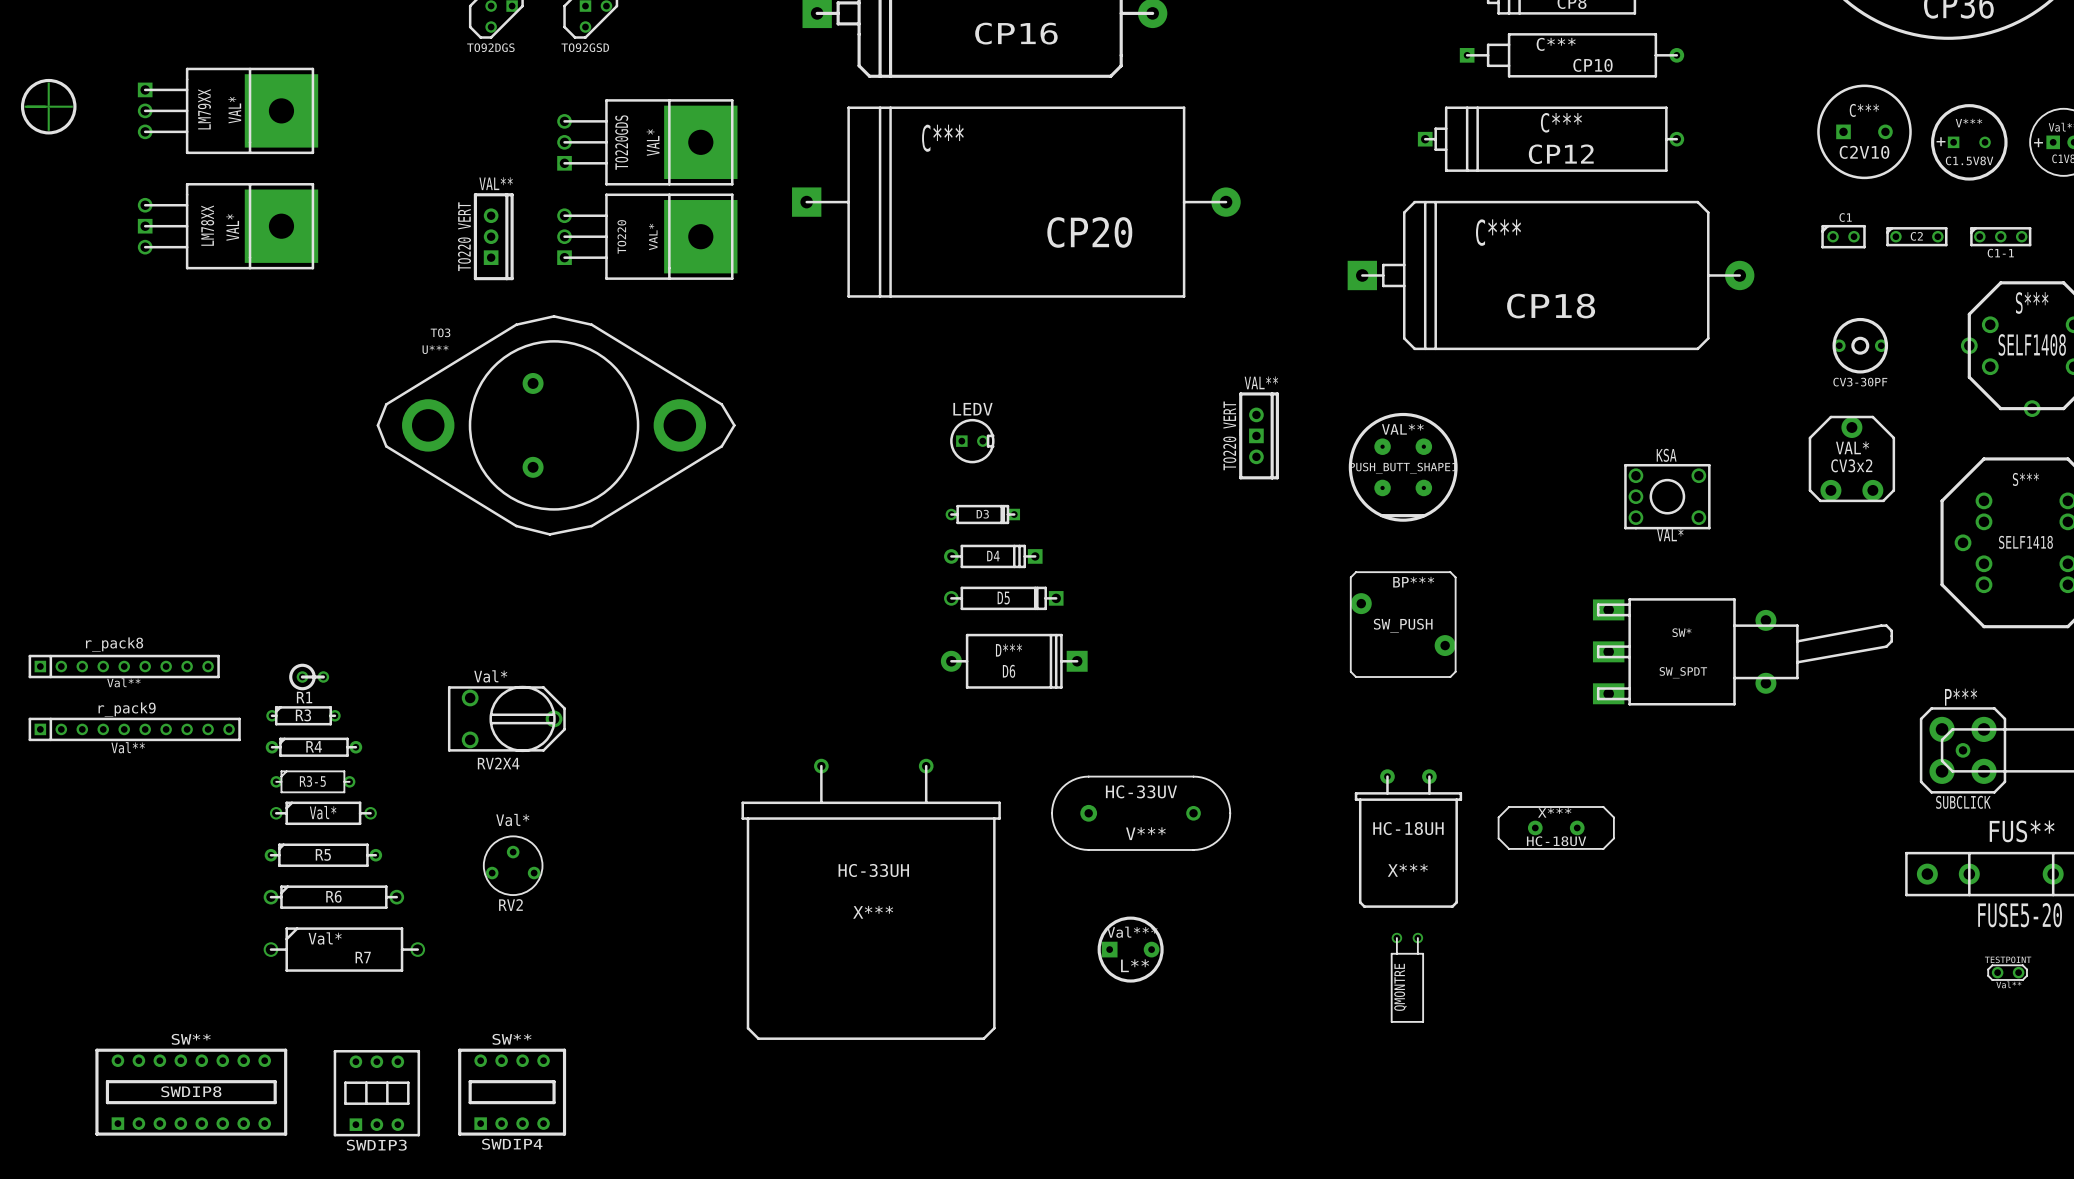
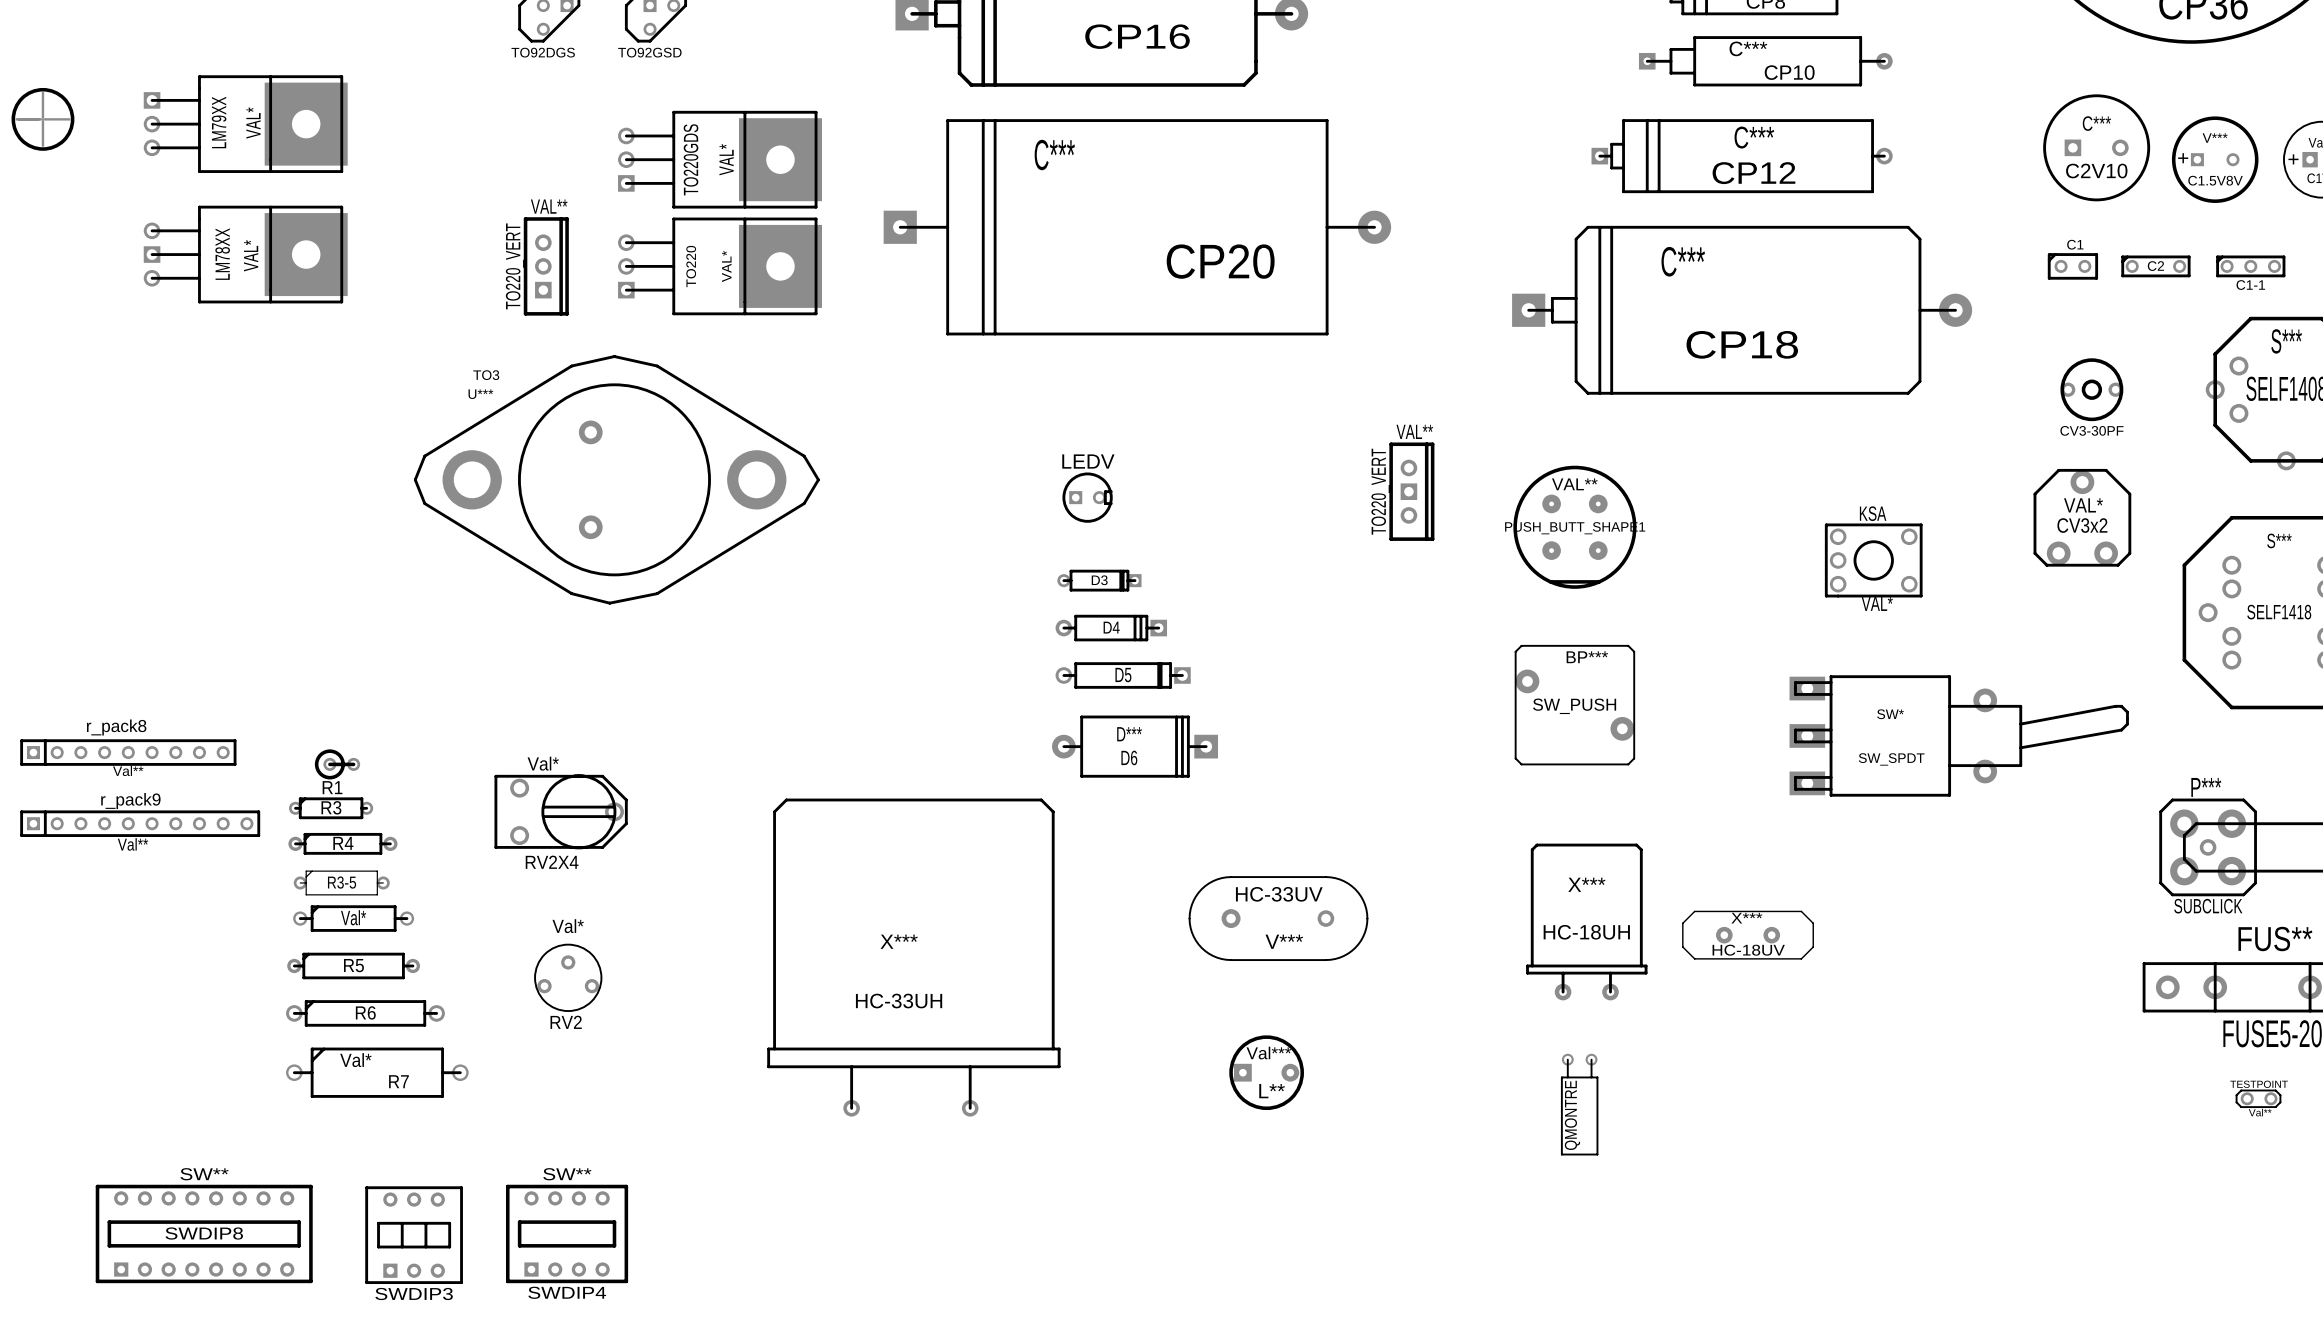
HC-33UV footprint: [1051, 775, 1232, 851] -> [1188, 876, 1369, 962]
HC-18UH rotation: 0° (1408, 838) -> 180° (1586, 922)
HC-33UH rotation: 0° (871, 899) -> 180° (913, 957)

